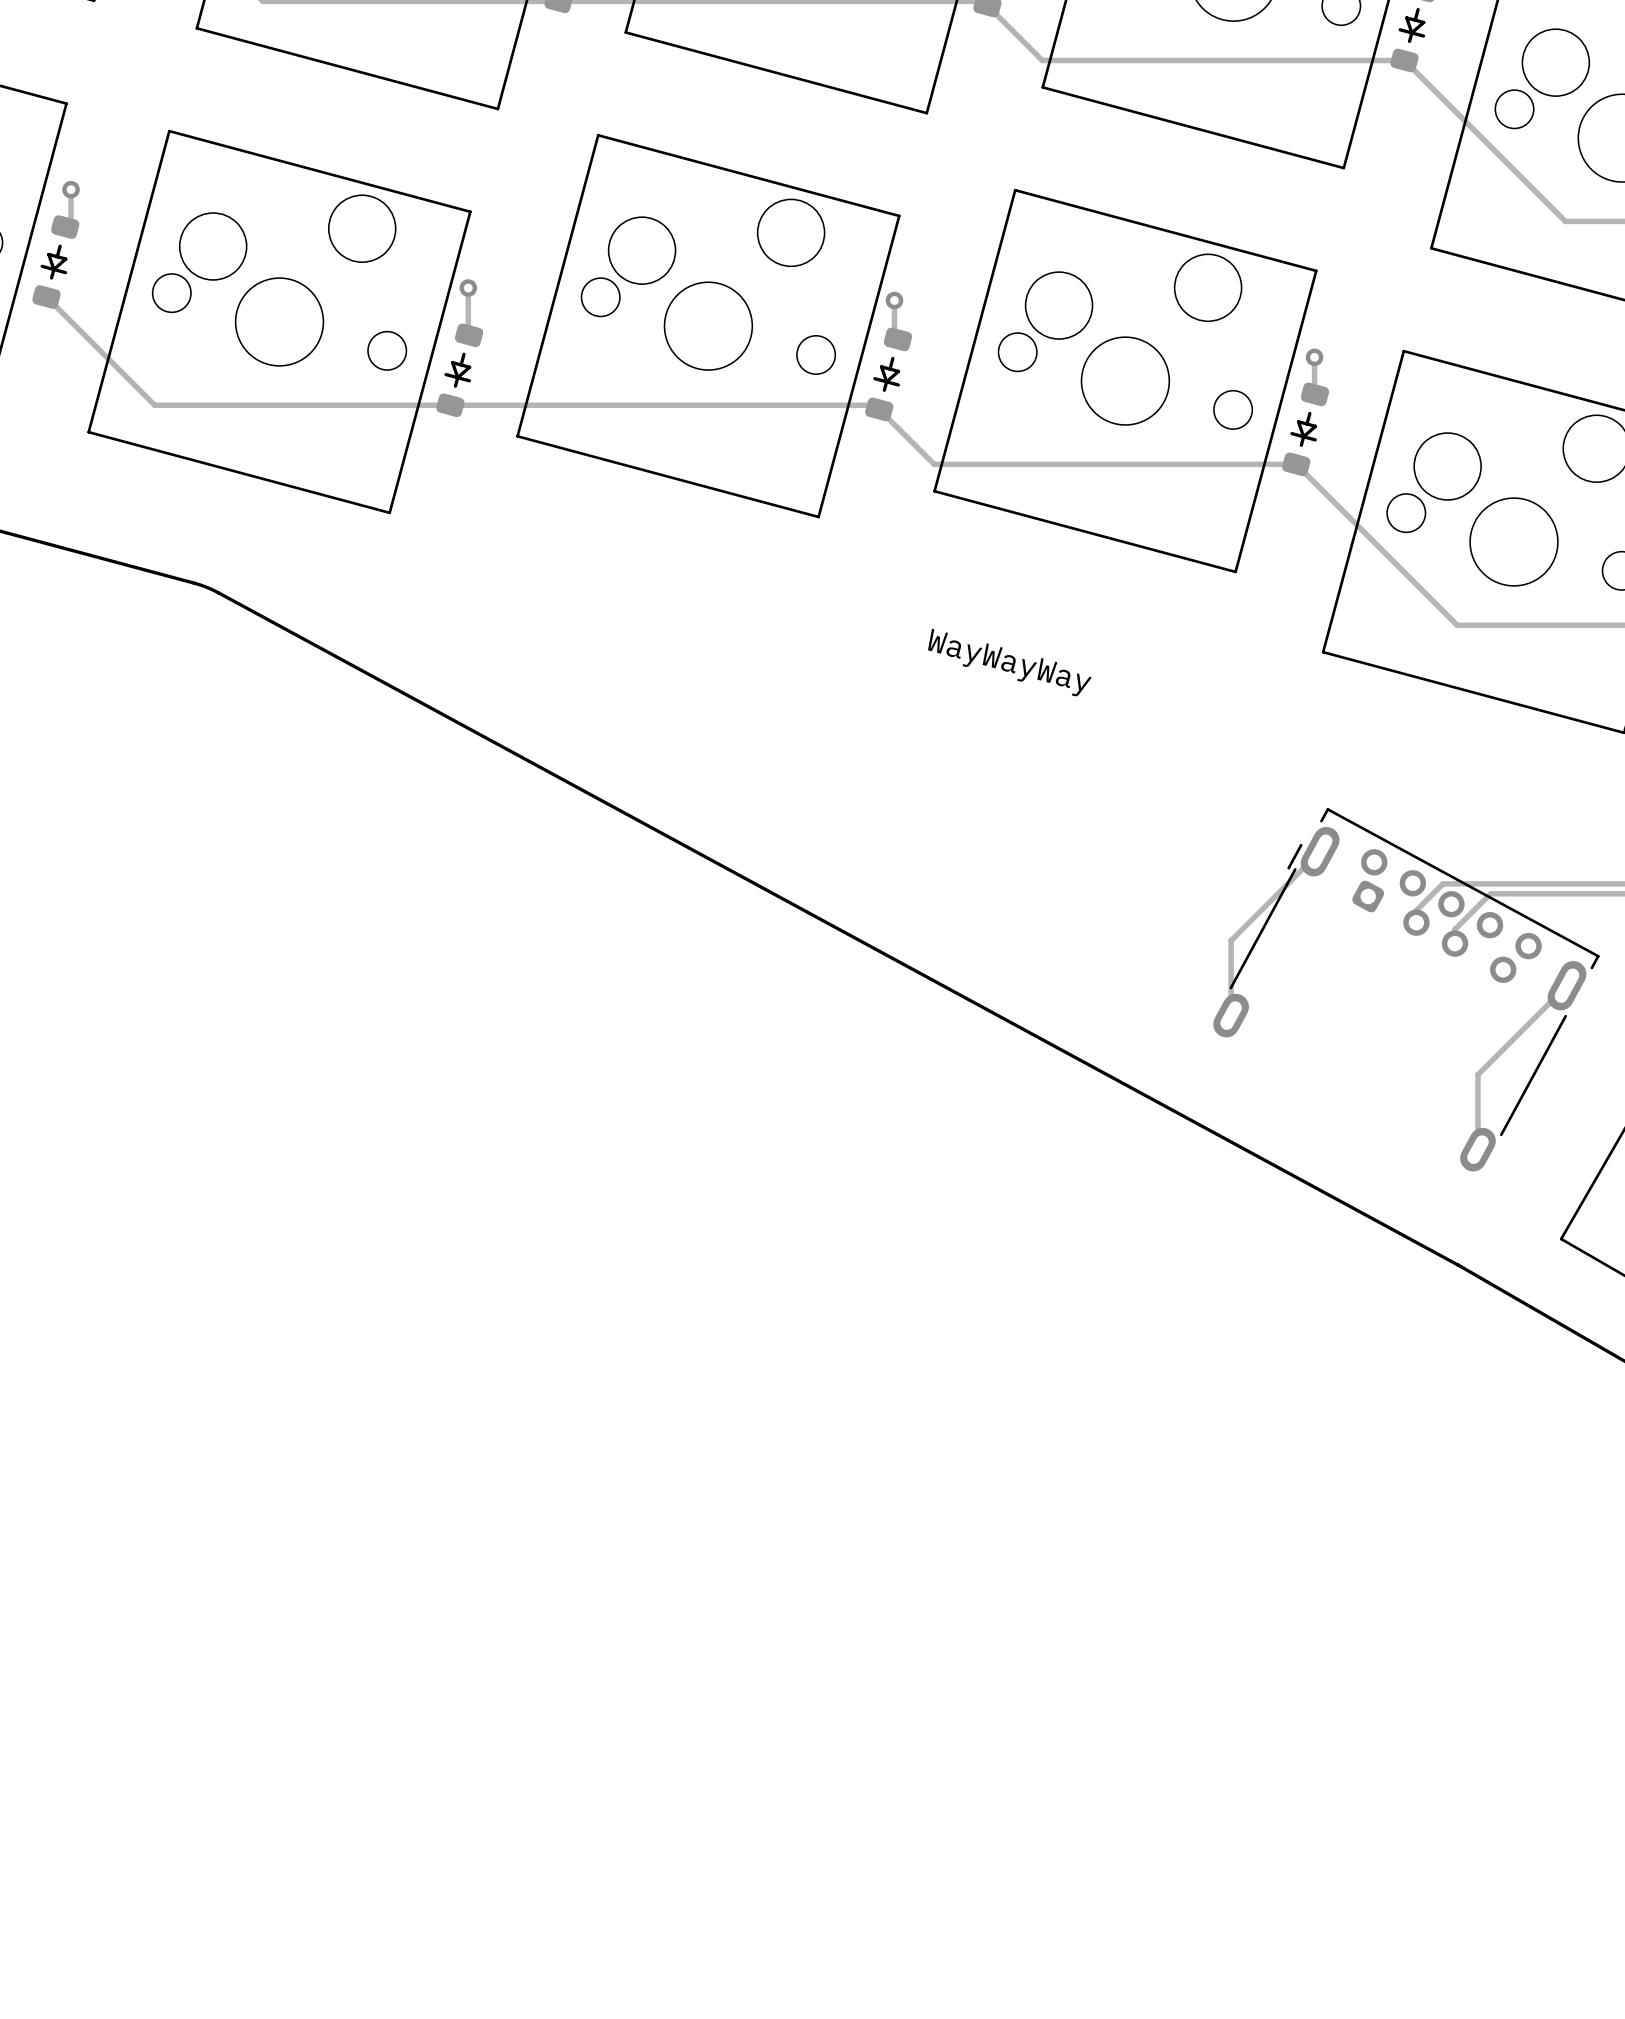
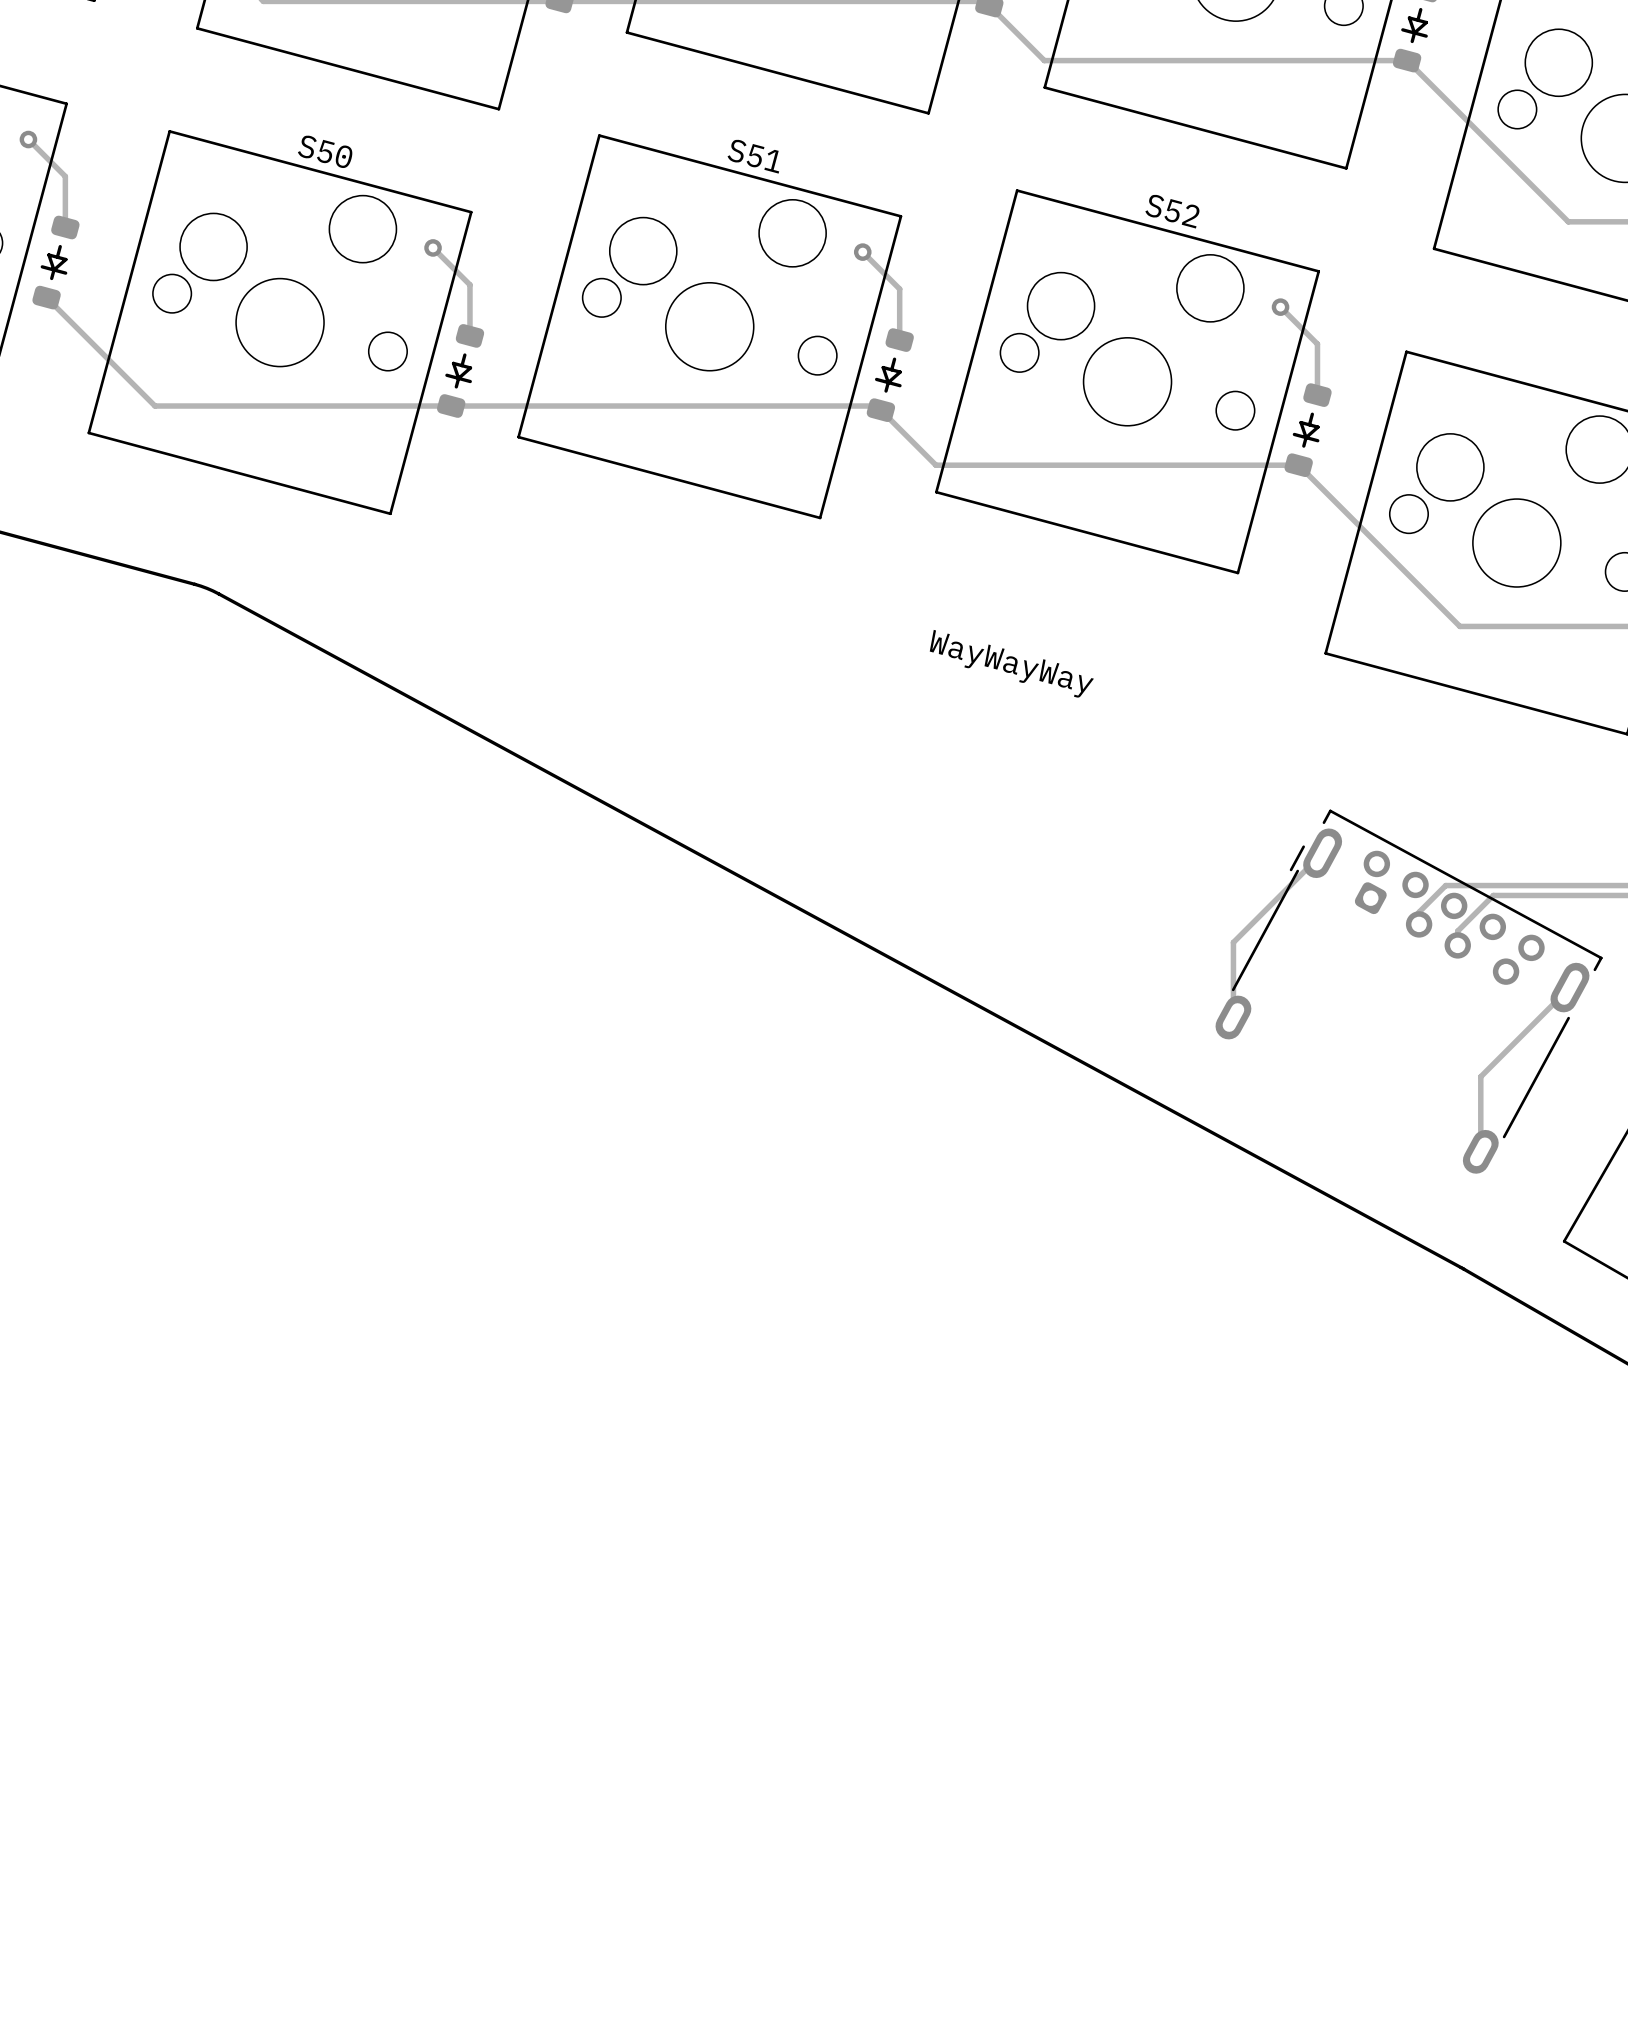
S50 name: none -> S50 (325, 151)
S51 name: none -> S51 (753, 156)
track: (71, 189) (71, 221) (65, 227) -> (28, 139) (65, 176) (65, 227)
via position: (71, 189) -> (28, 139)
S52 name: none -> S52 (1172, 211)
track: (468, 288) (469, 335) -> (433, 247) (469, 284) (469, 335)
via position: (468, 288) -> (433, 247)
track: (894, 300) (894, 335) (897, 339) -> (862, 252) (899, 289) (899, 340)
via position: (894, 300) -> (862, 252)
track: (1314, 357) (1314, 394) -> (1280, 307) (1317, 344) (1317, 395)
via position: (1314, 357) -> (1280, 307)

